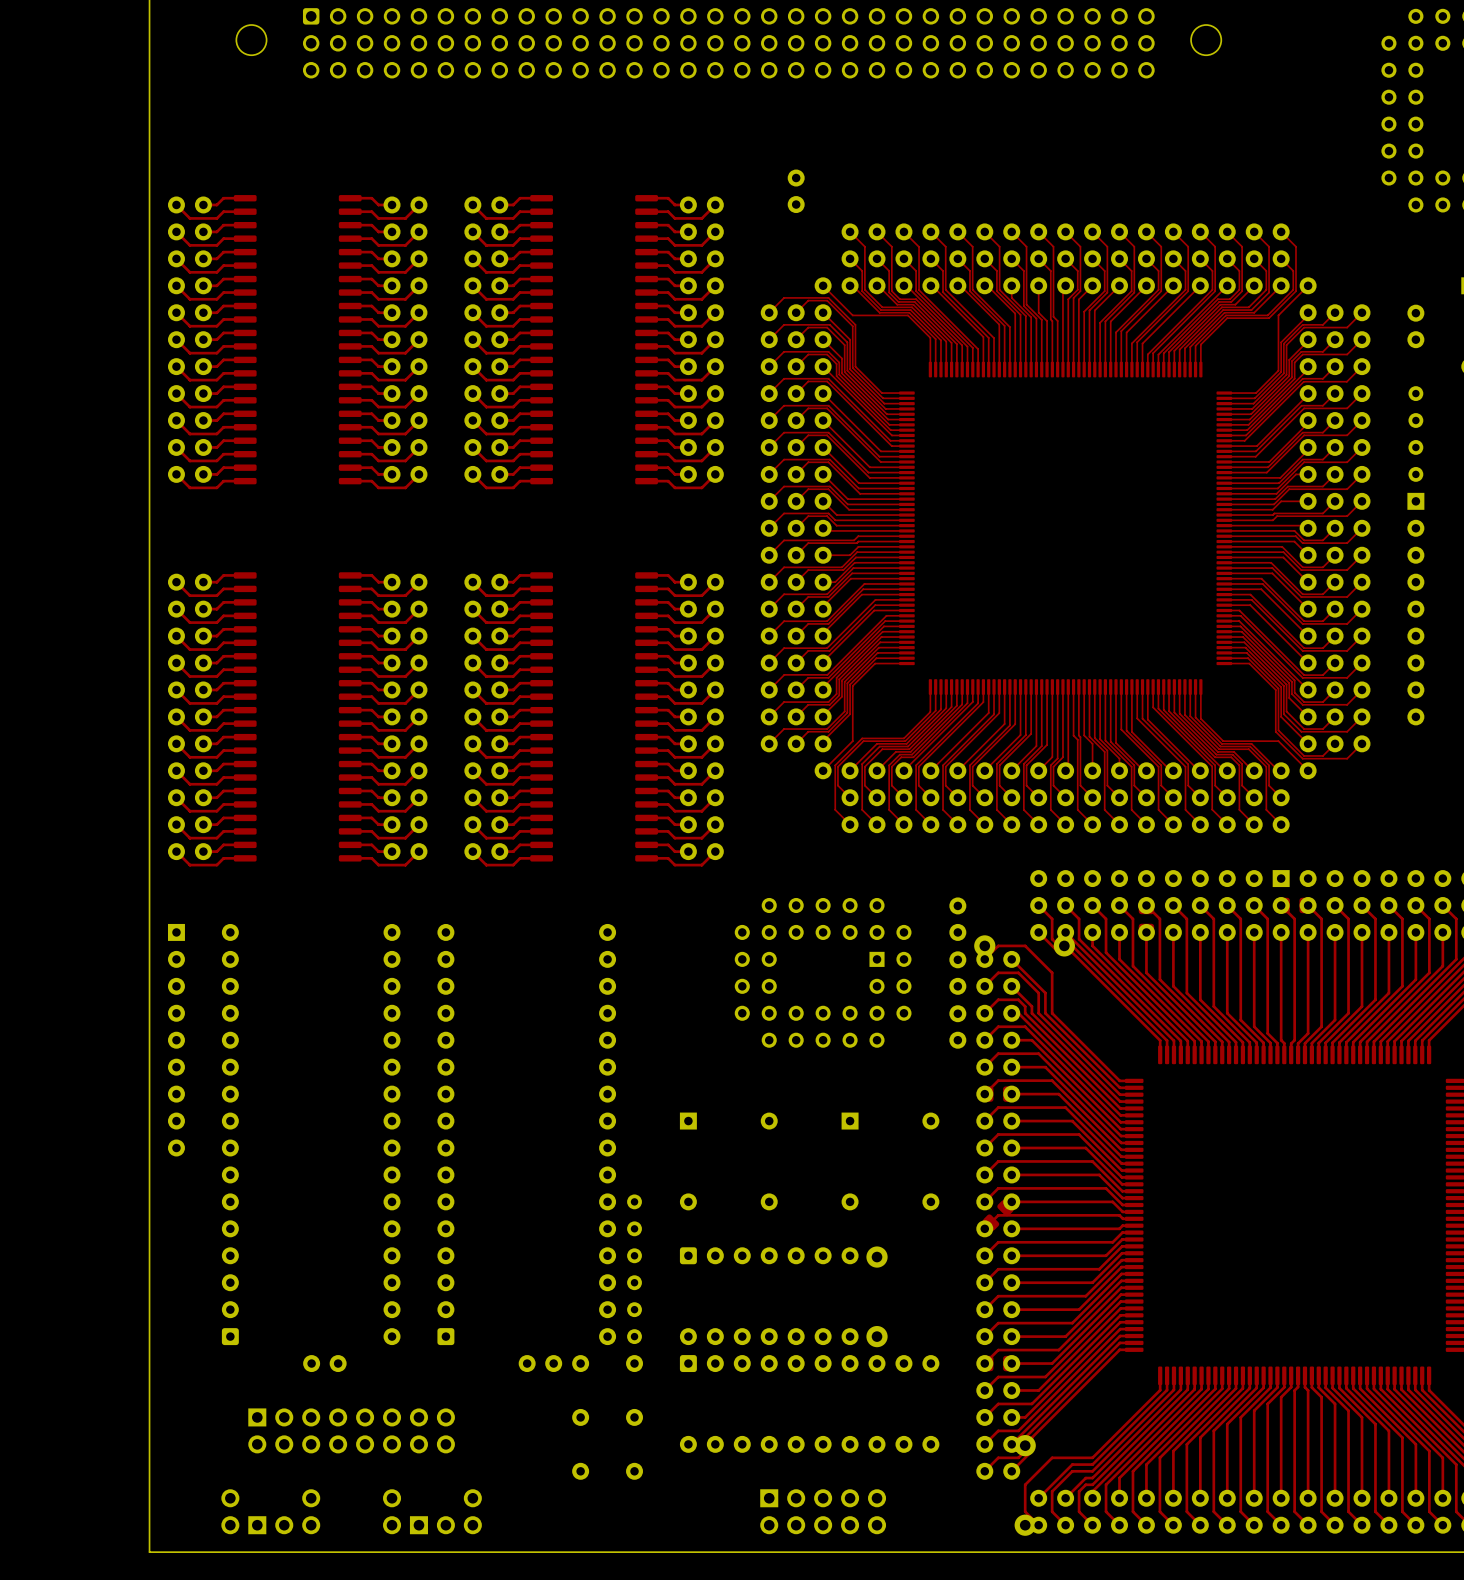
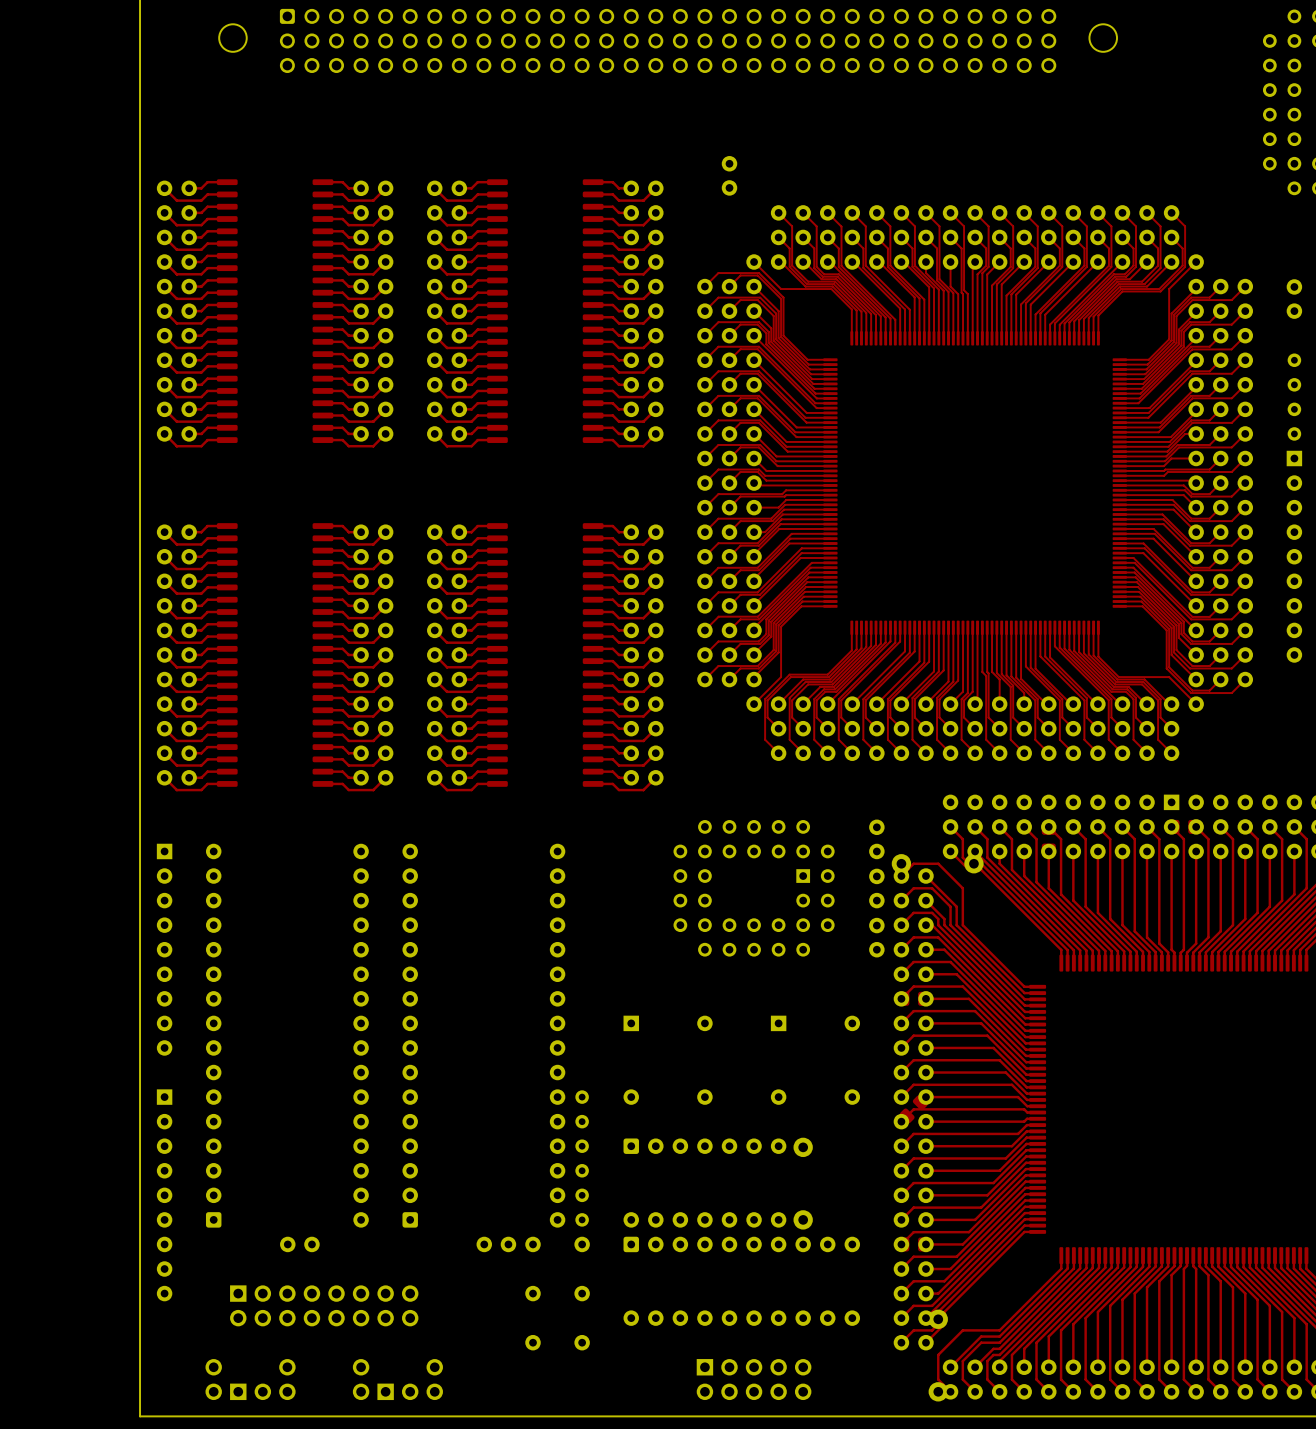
part: none -> (164, 1195)

